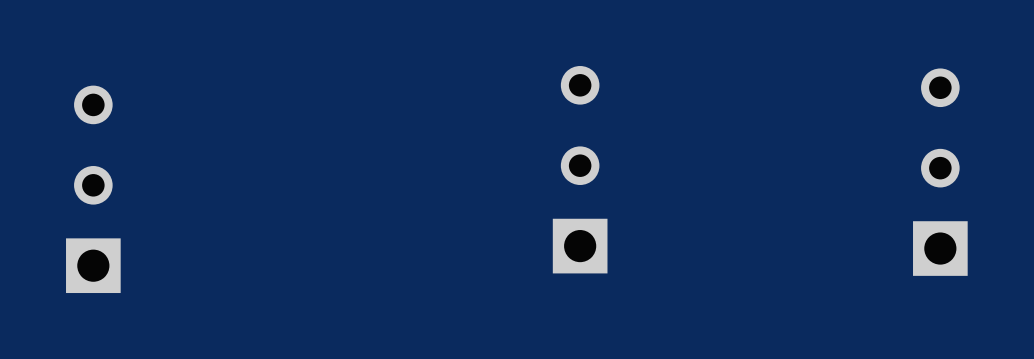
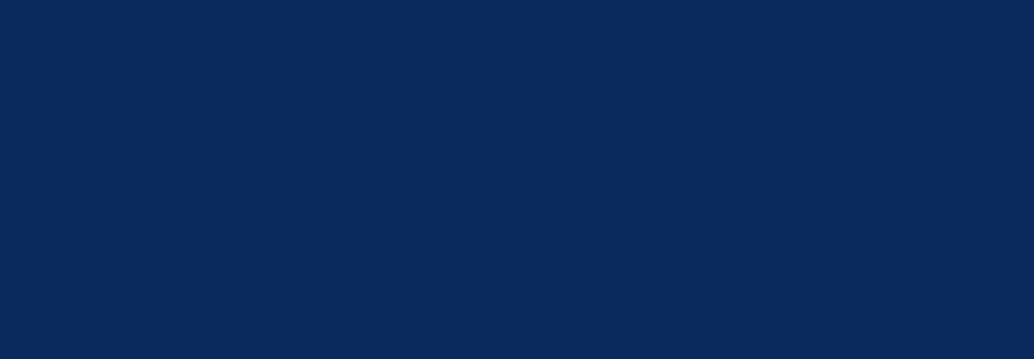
part: (580, 165) -> none
part: (940, 168) -> none
part: (93, 185) -> none
part: (580, 246) -> none
part: (940, 248) -> none
part: (93, 265) -> none

